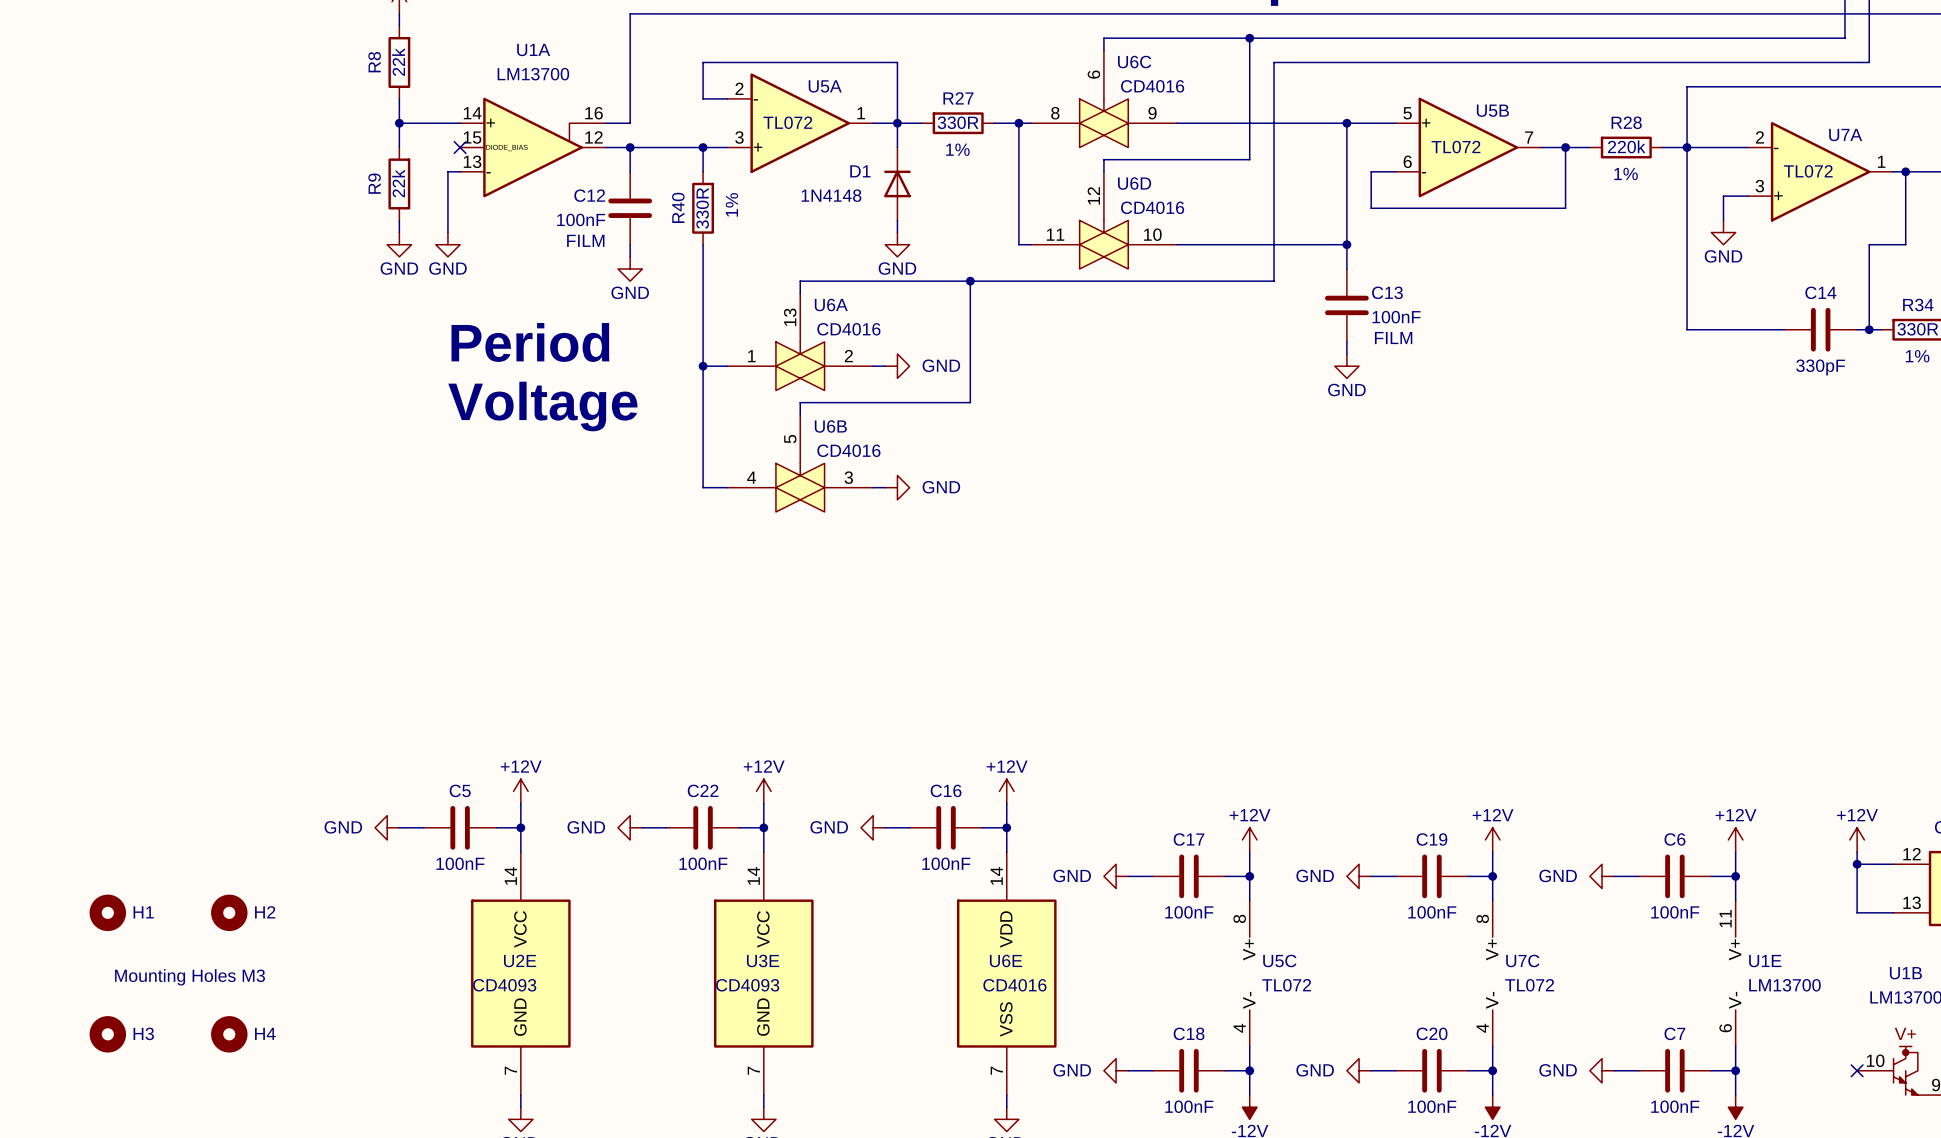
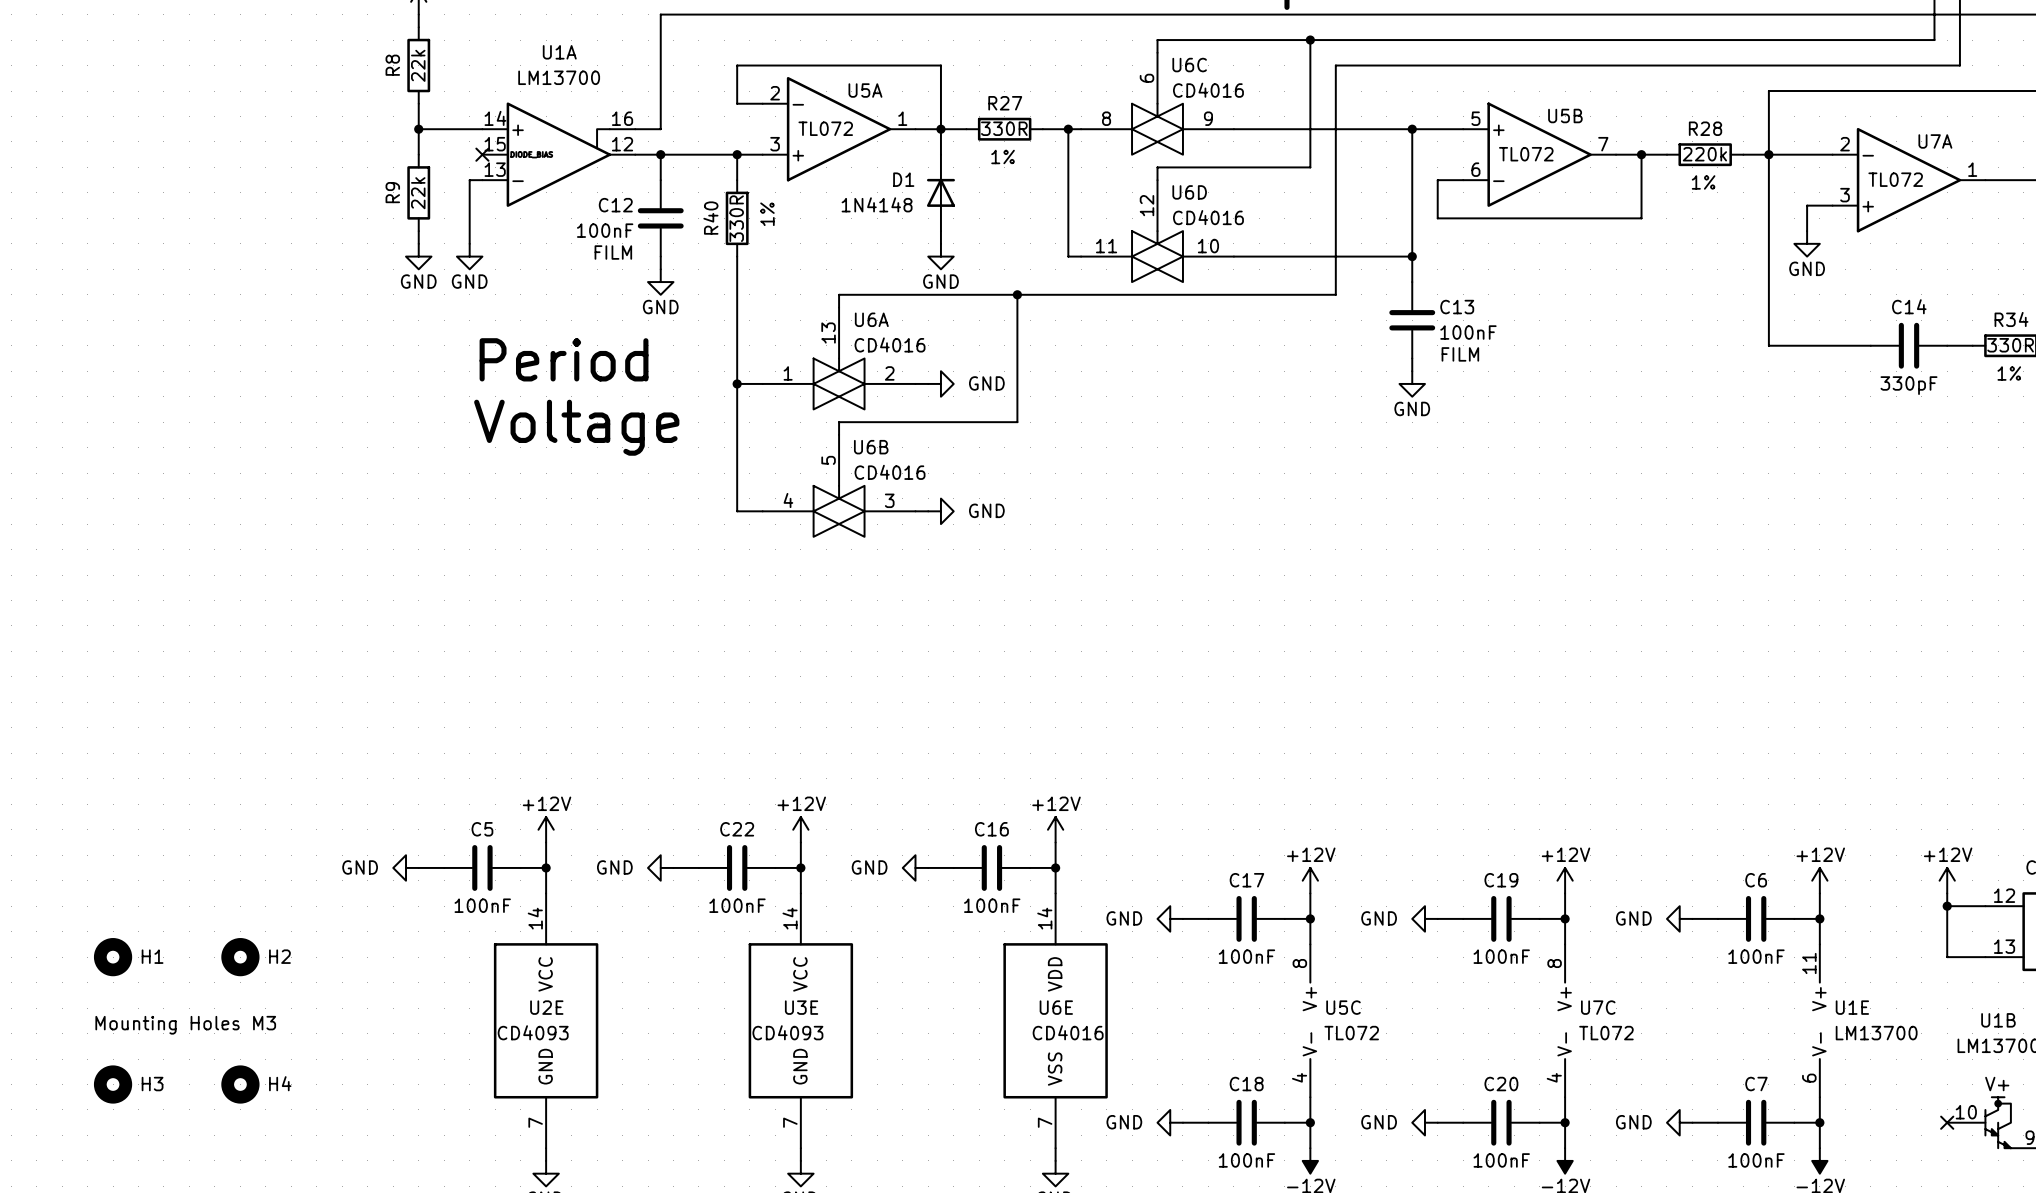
wire: (1905, 171) (1905, 244) (1869, 244) (1869, 329) -> none
junction: (1905, 171) -> none
junction: (1869, 329) -> none

